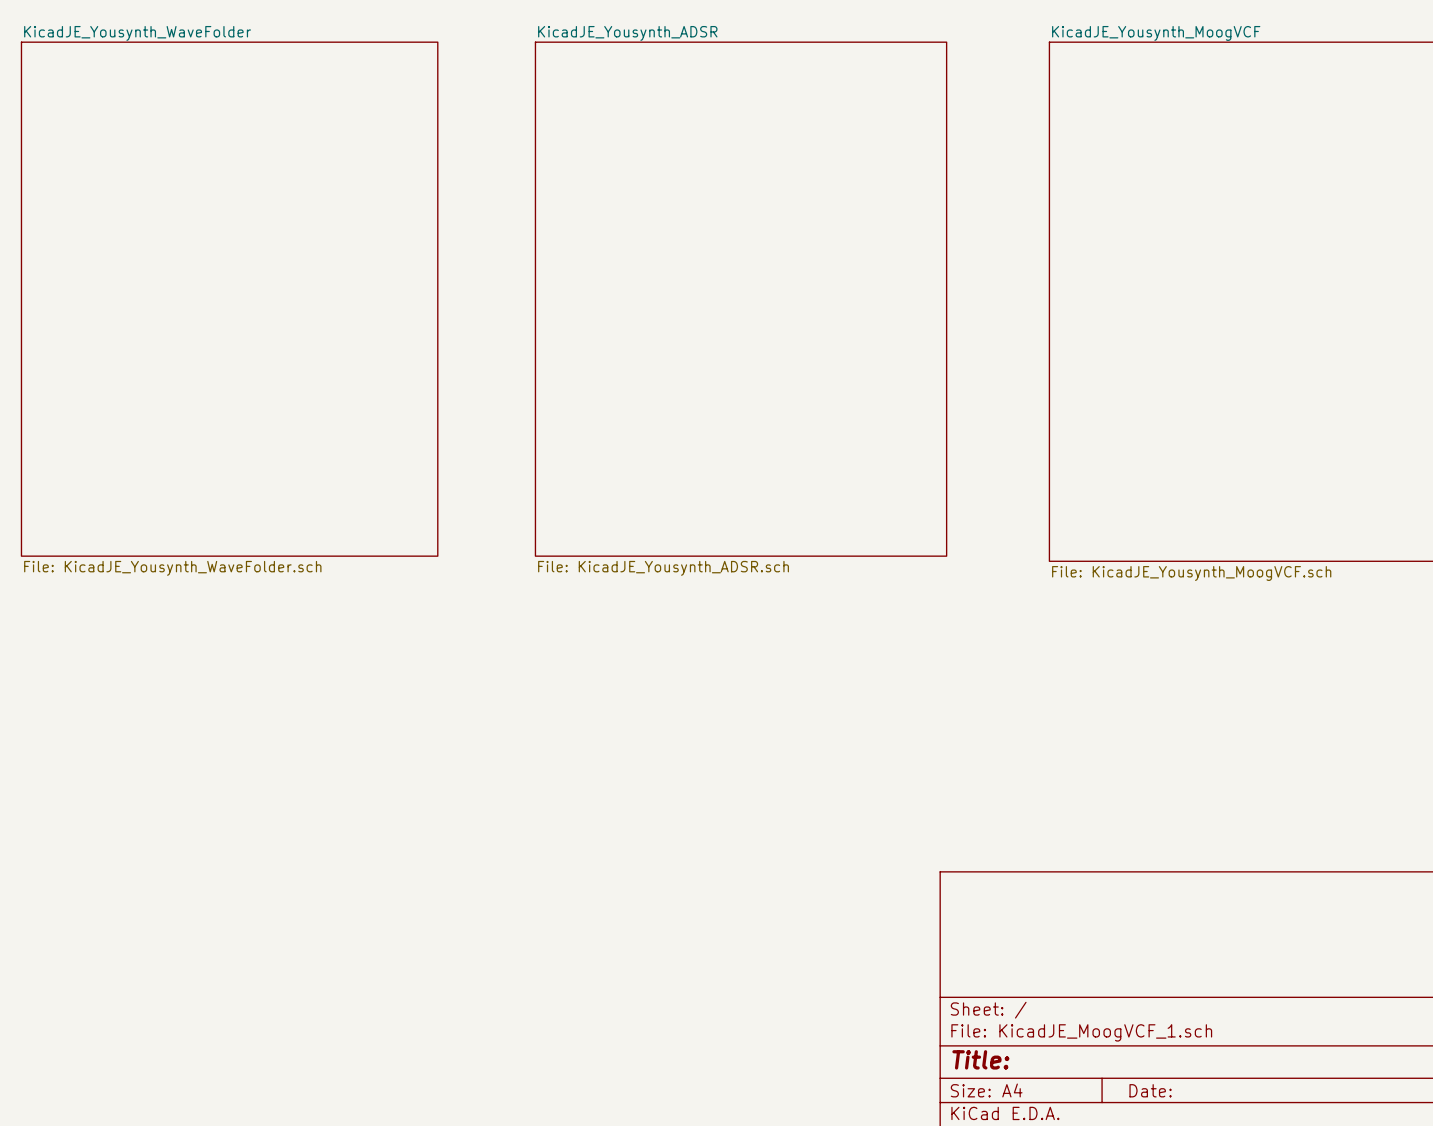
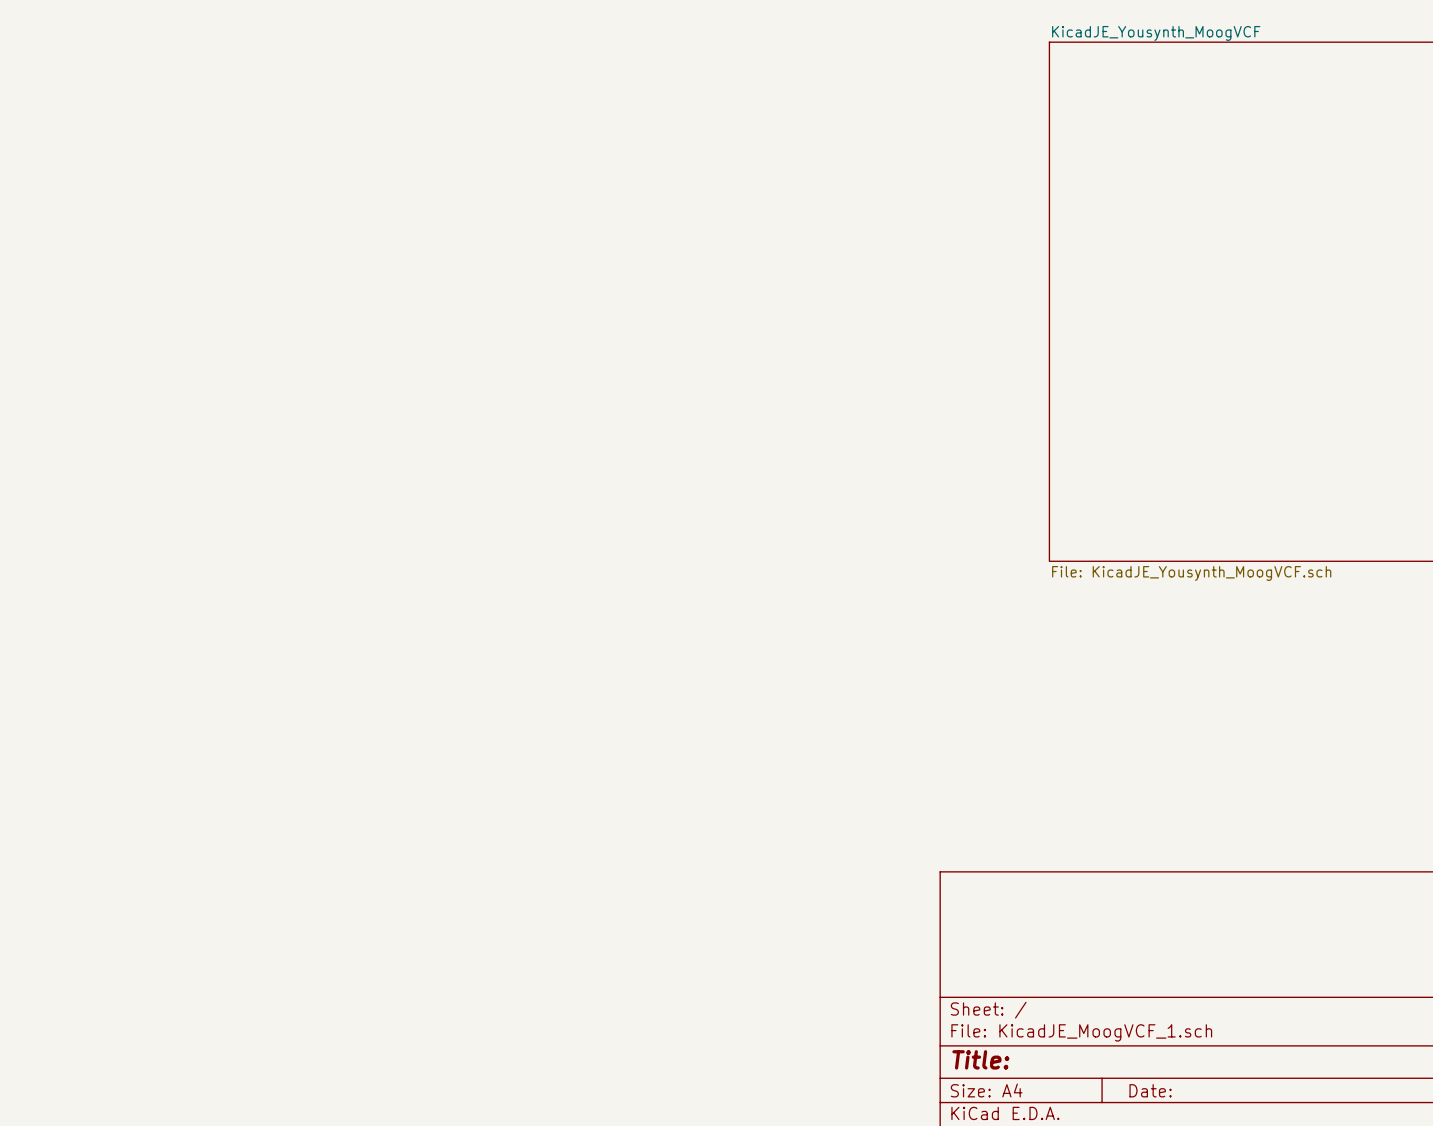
sheet KicadJE_Yousynth_WaveFolder: File: KicadJE_Yousynth_WaveFolder.sch (229, 299) -> none
sheet KicadJE_Yousynth_ADSR: File: KicadJE_Yousynth_ADSR.sch (741, 299) -> none

